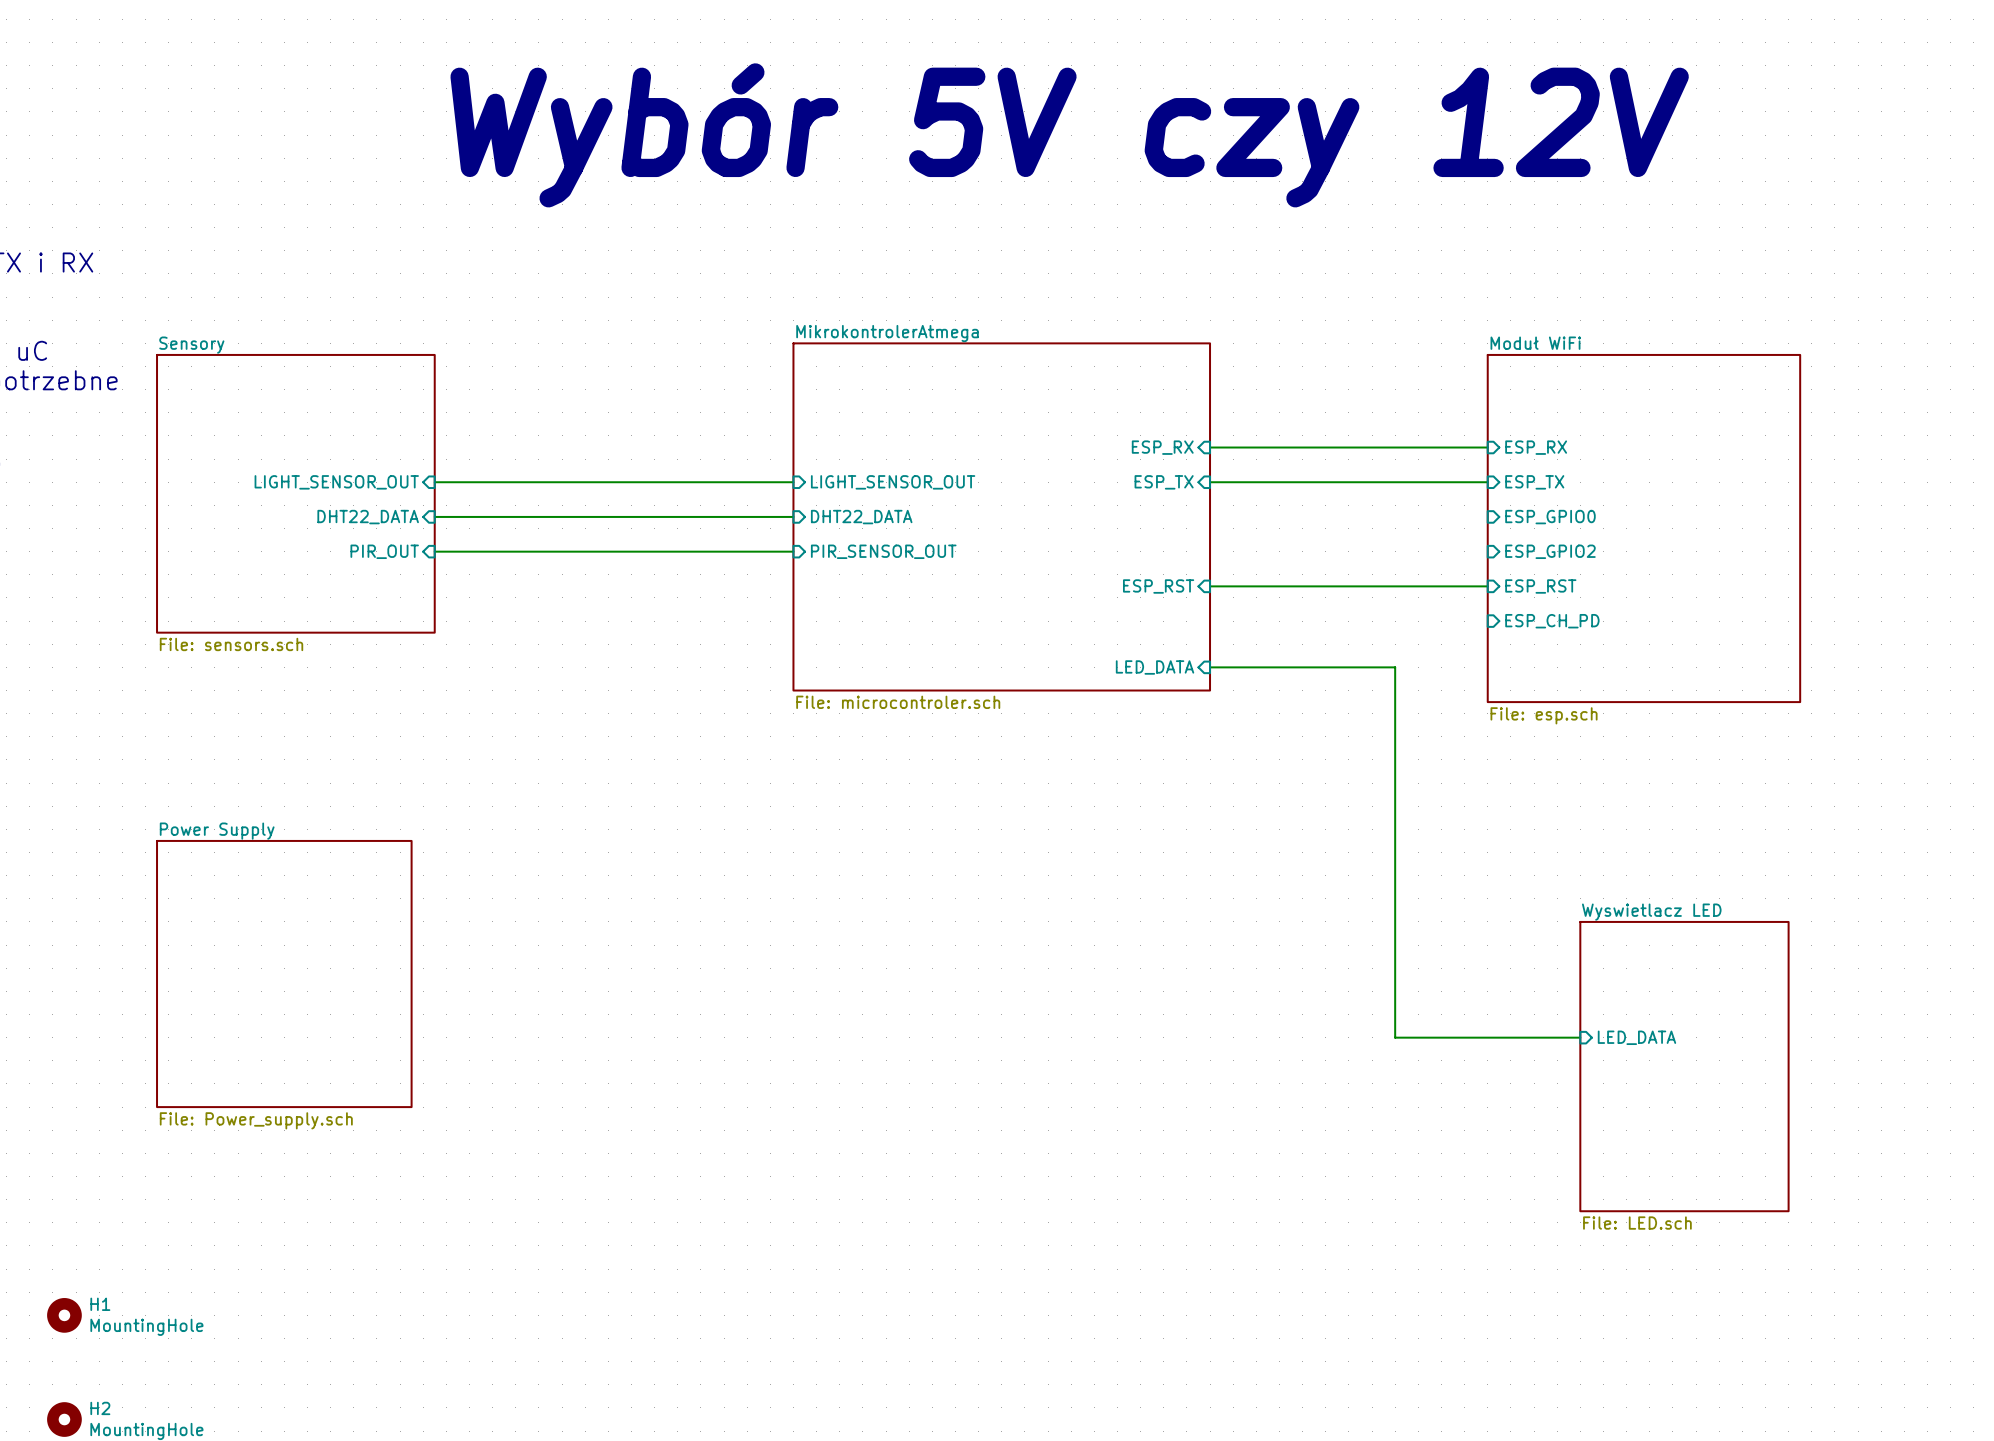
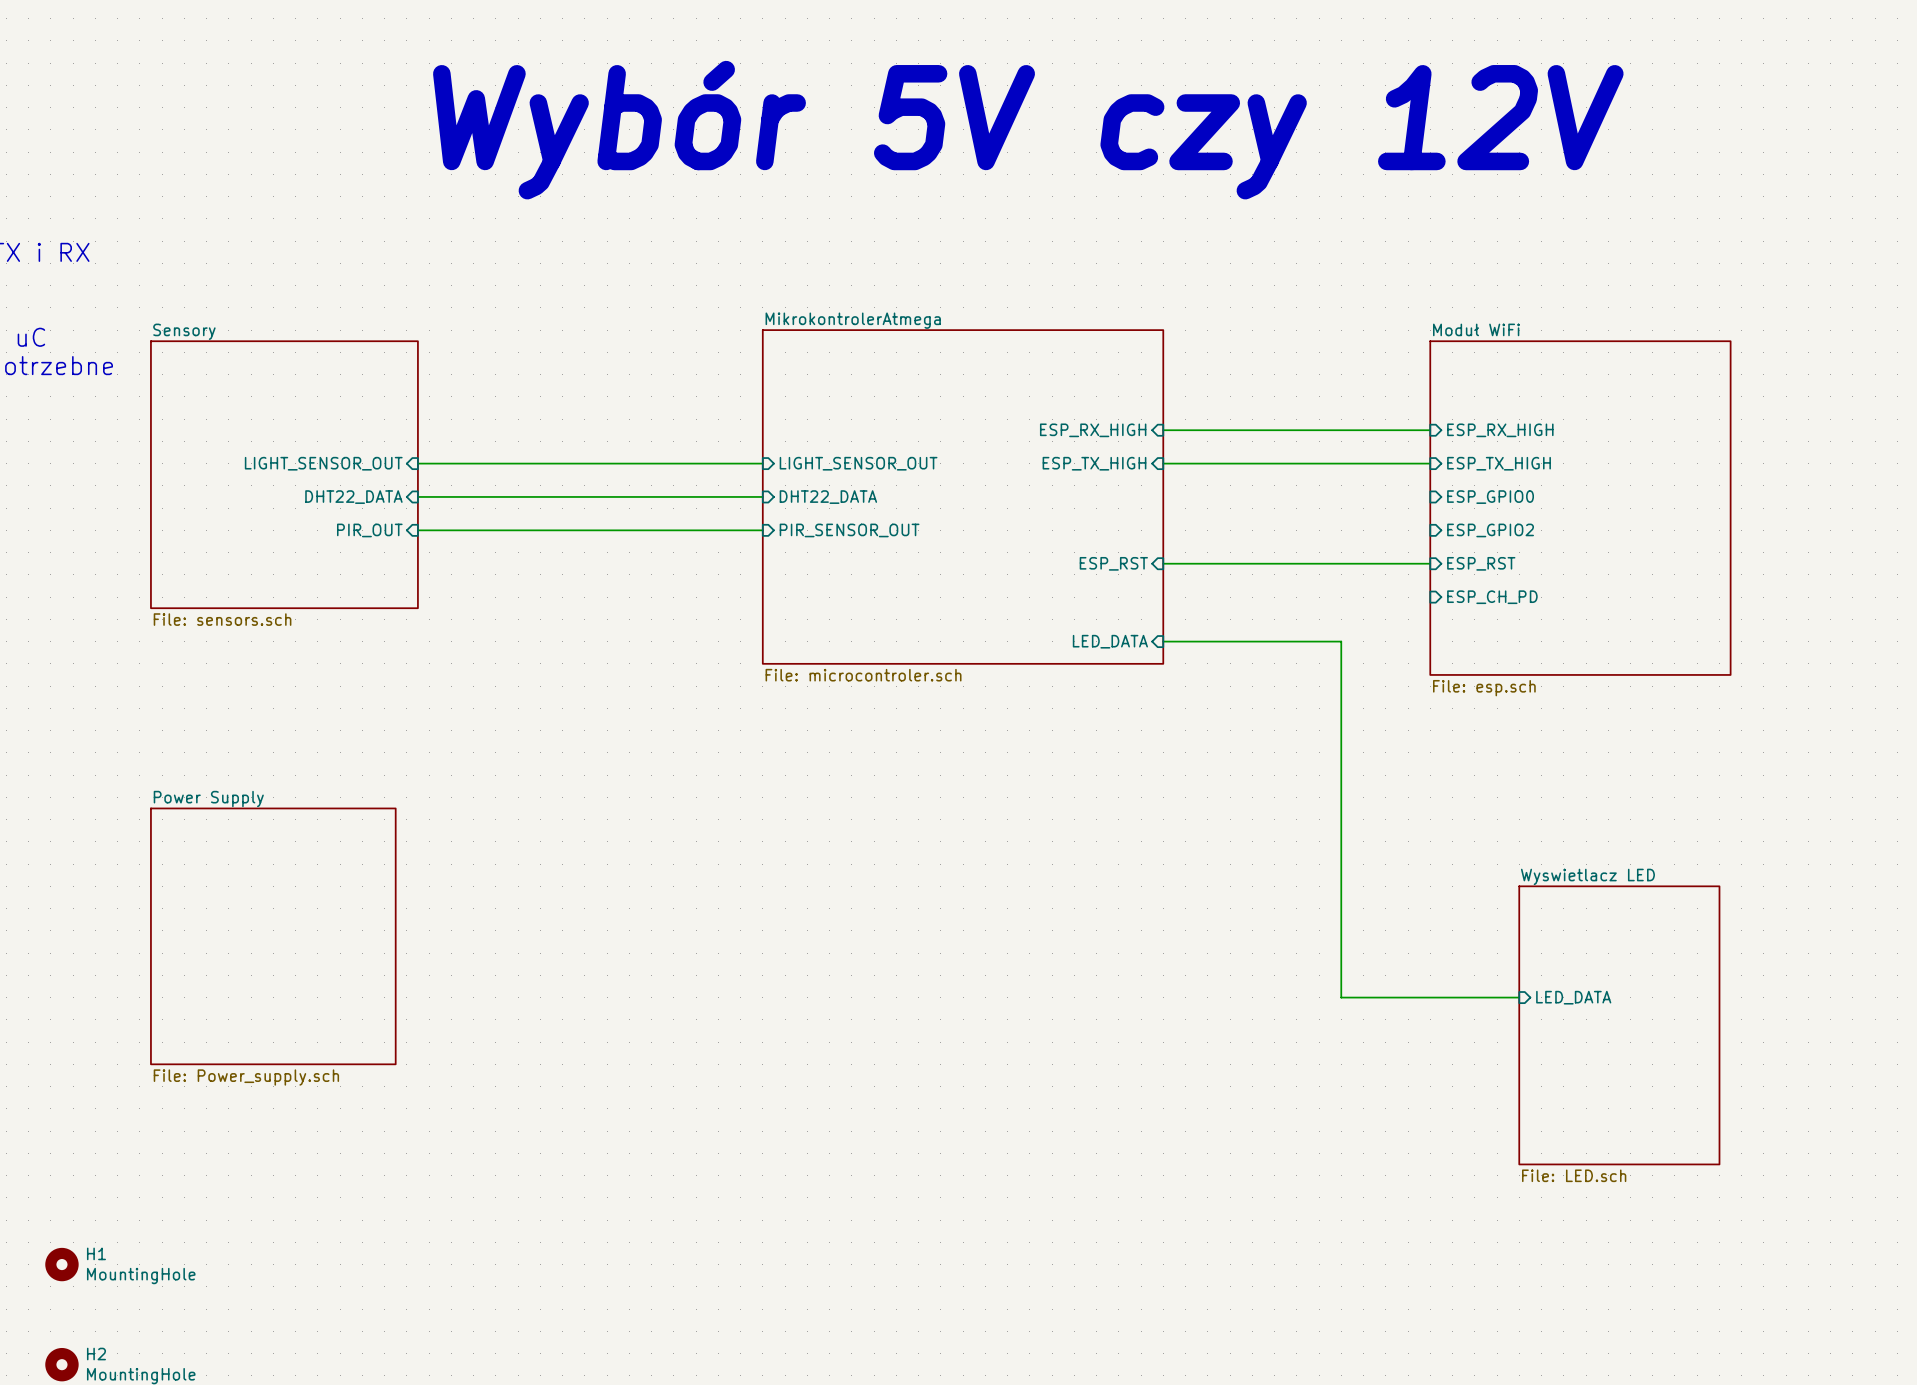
sheet pin: ESP_RX (1162, 447) -> ESP_RX_HIGH (1093, 430)
sheet pin: ESP_RX (1536, 447) -> ESP_RX_HIGH (1500, 430)
sheet pin: ESP_TX (1164, 482) -> ESP_TX_HIGH (1094, 463)
sheet pin: ESP_TX (1534, 482) -> ESP_TX_HIGH (1499, 463)

